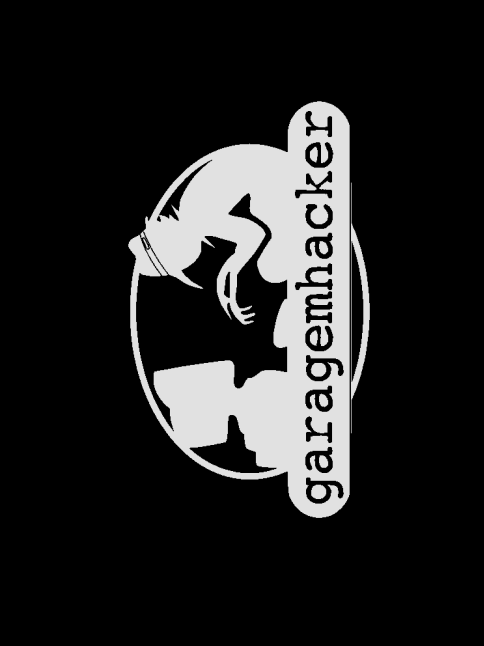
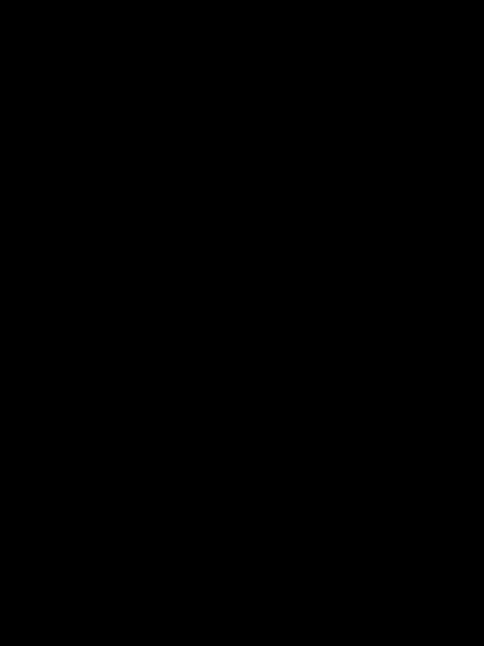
drawing: [128, 101, 370, 518] -> none

